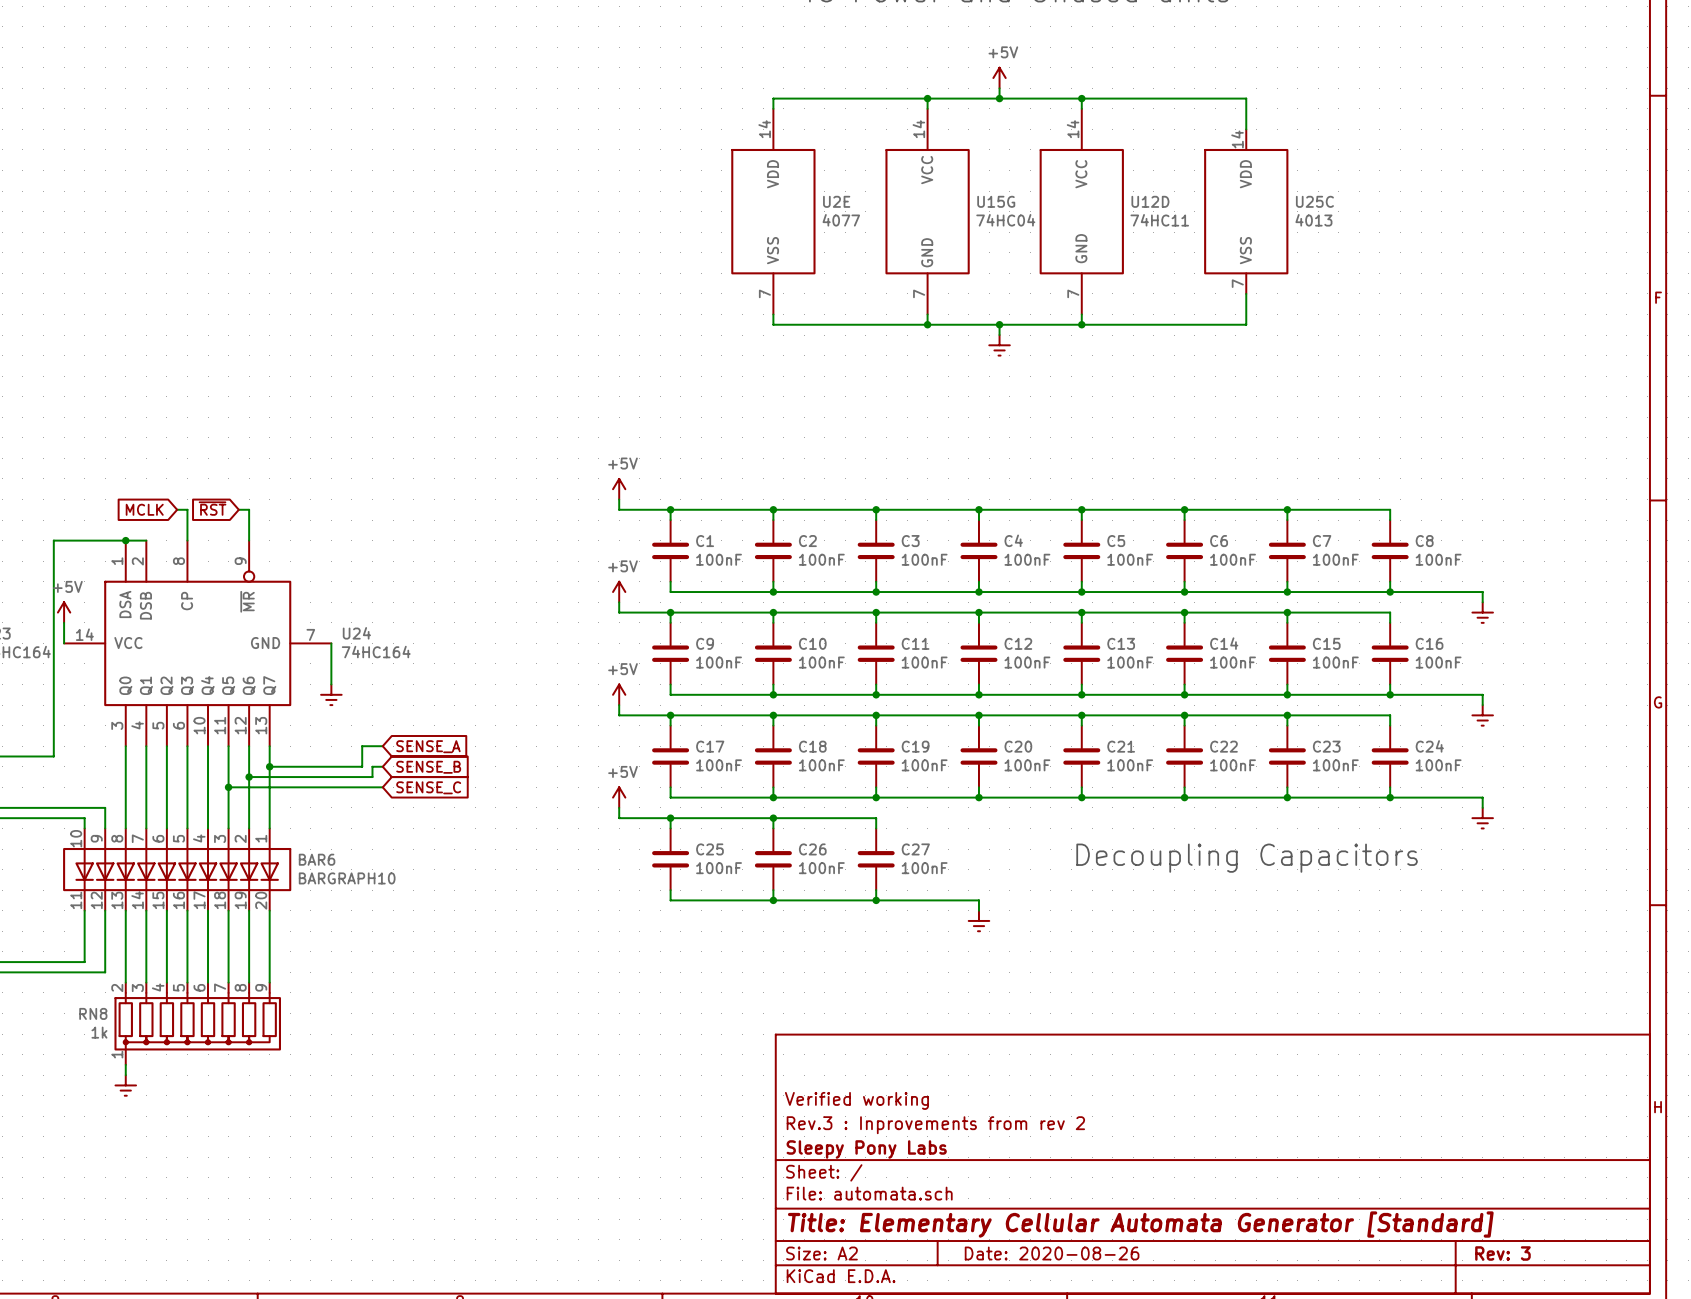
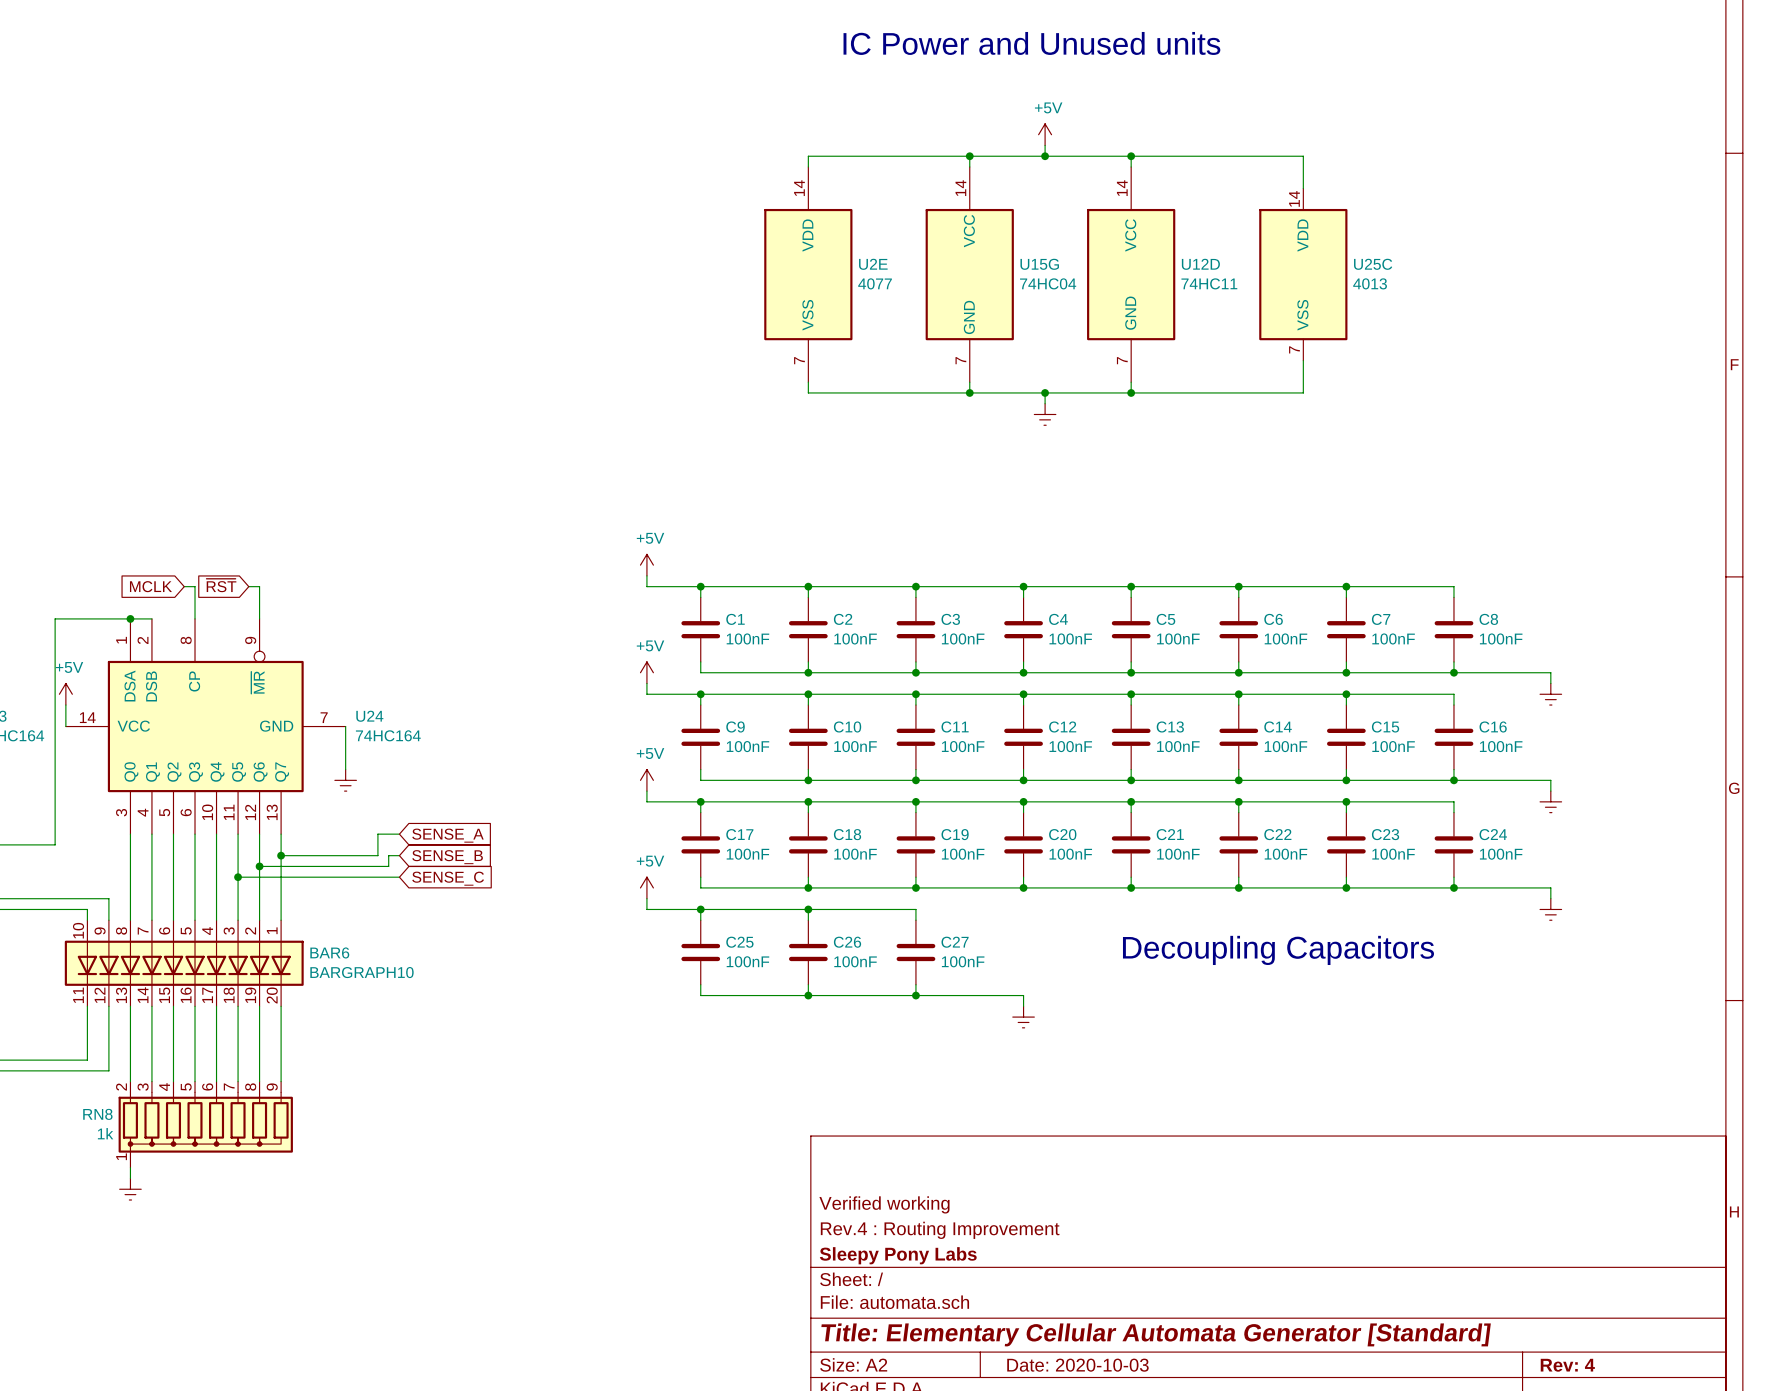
title block: Rev.3 : Inprovements from rev 2 (935, 1125) -> Rev.4 : Routing Improvement (940, 1230)
title block: Date: 2020-08-26 (1052, 1253) -> Date: 2020-10-03 (1077, 1365)
title block: Rev: 3 (1502, 1253) -> Rev: 4 (1567, 1365)

